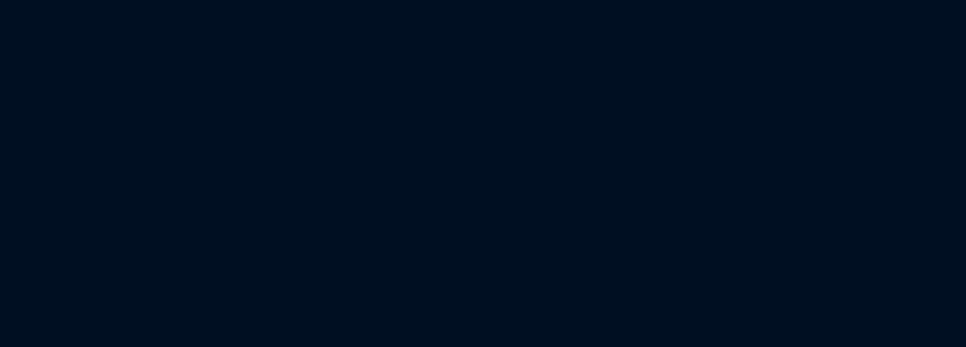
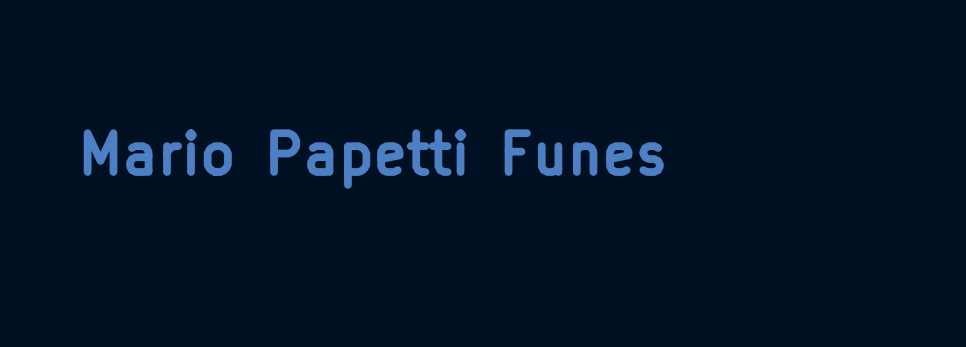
text: none -> Mario Papetti Funes (373, 159)

